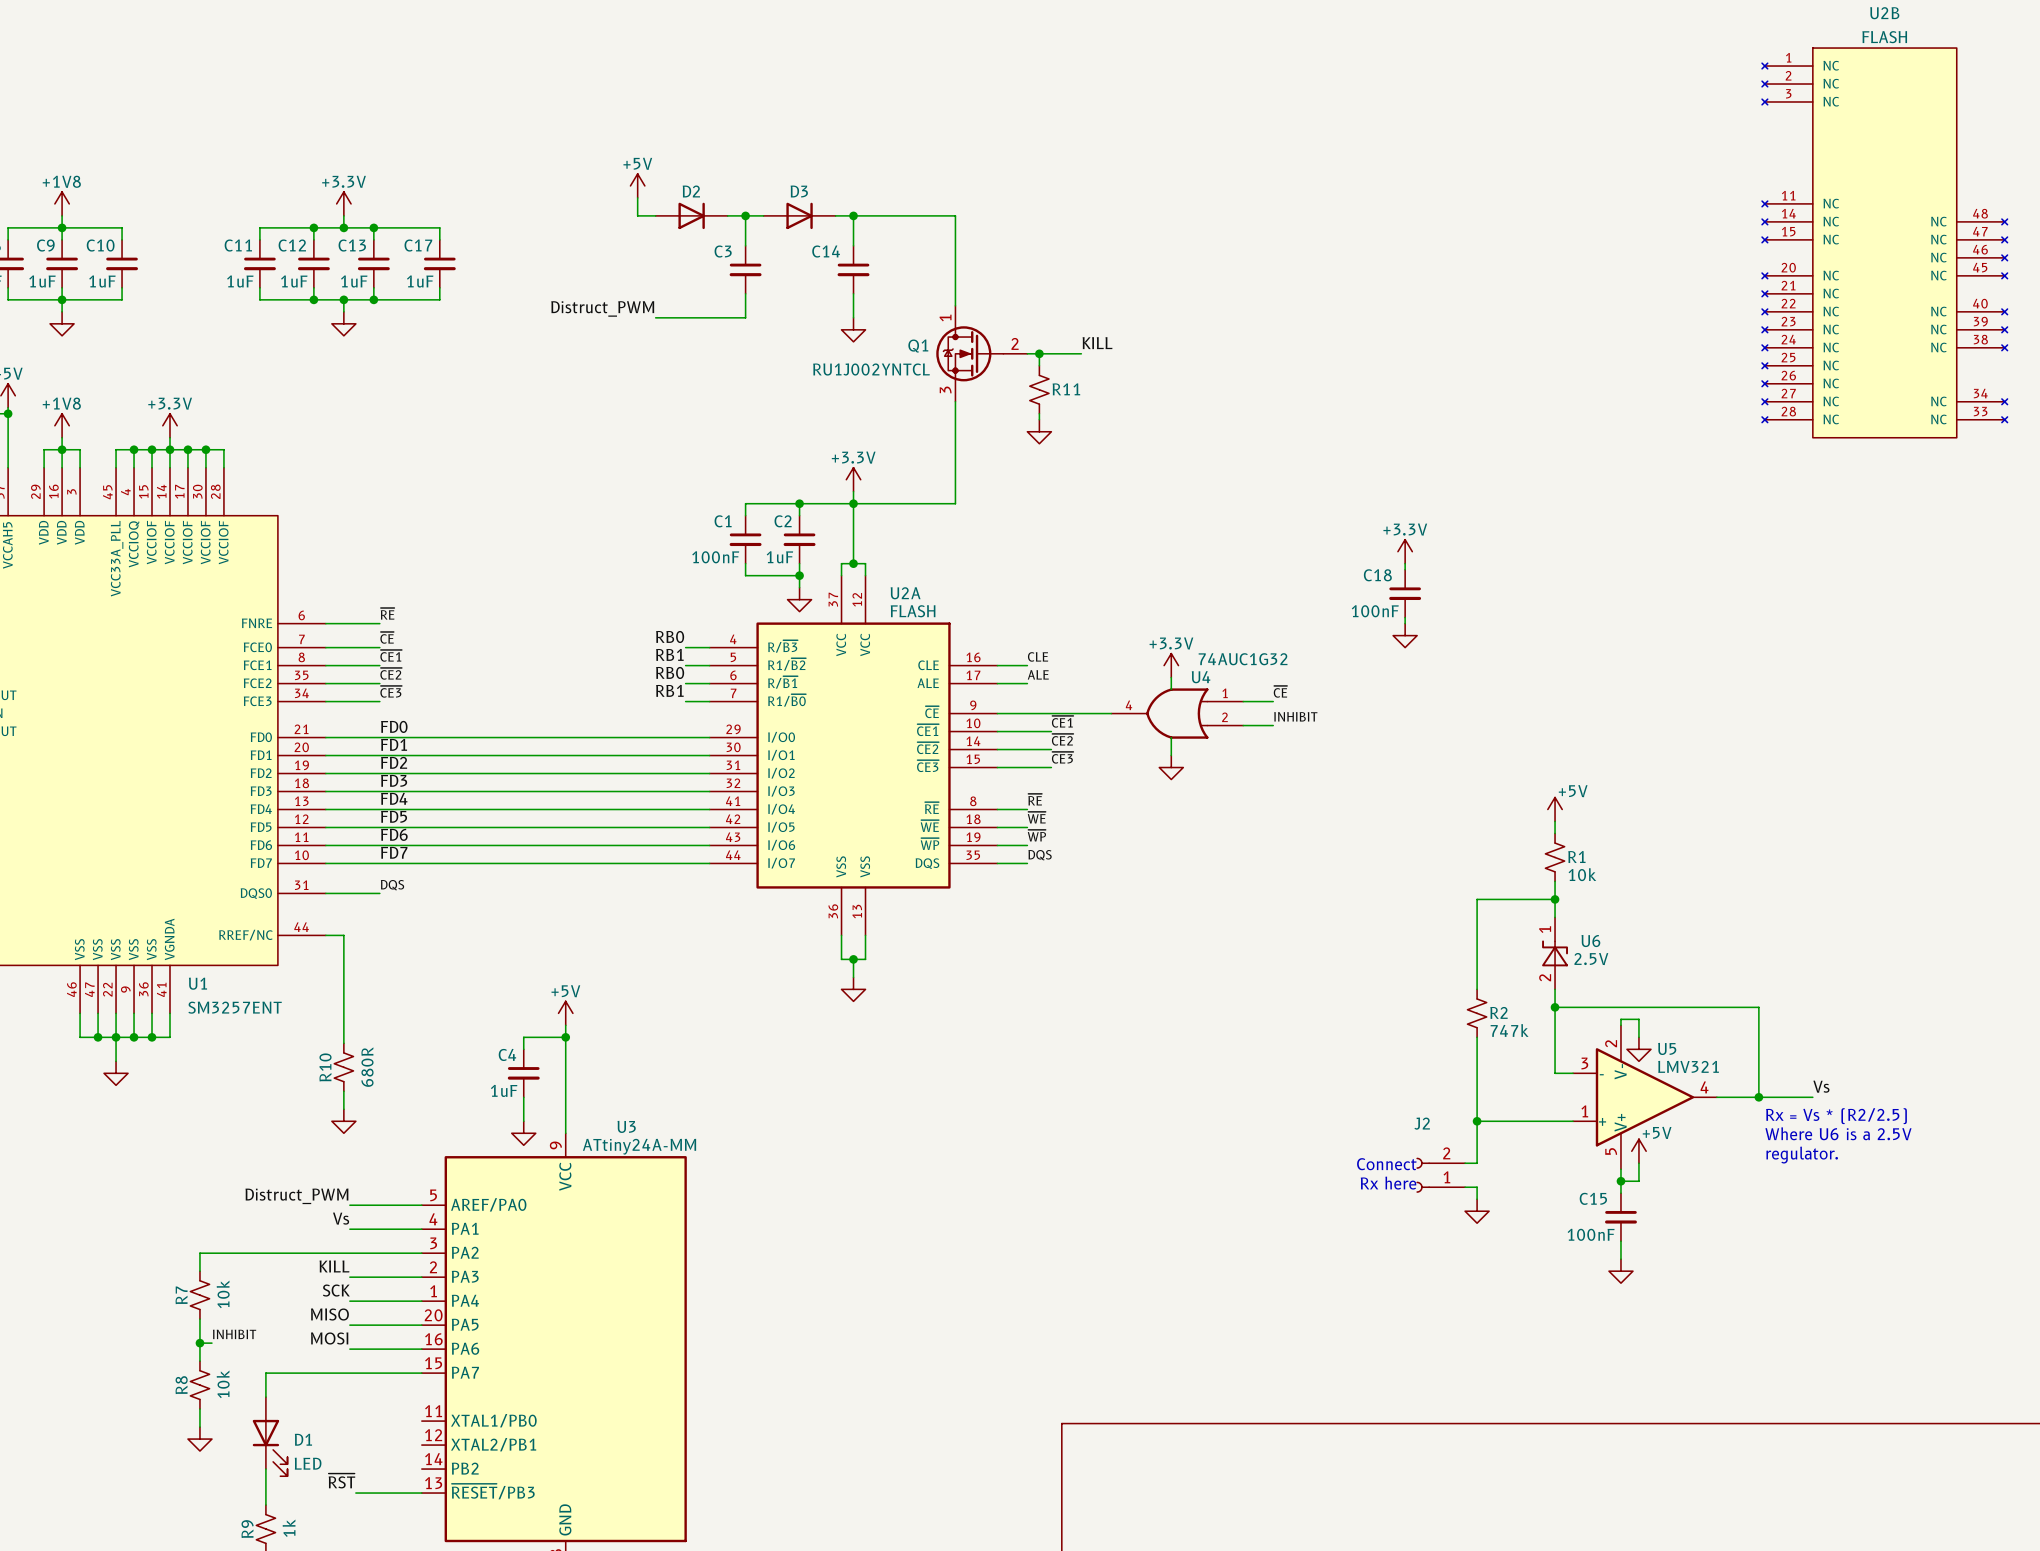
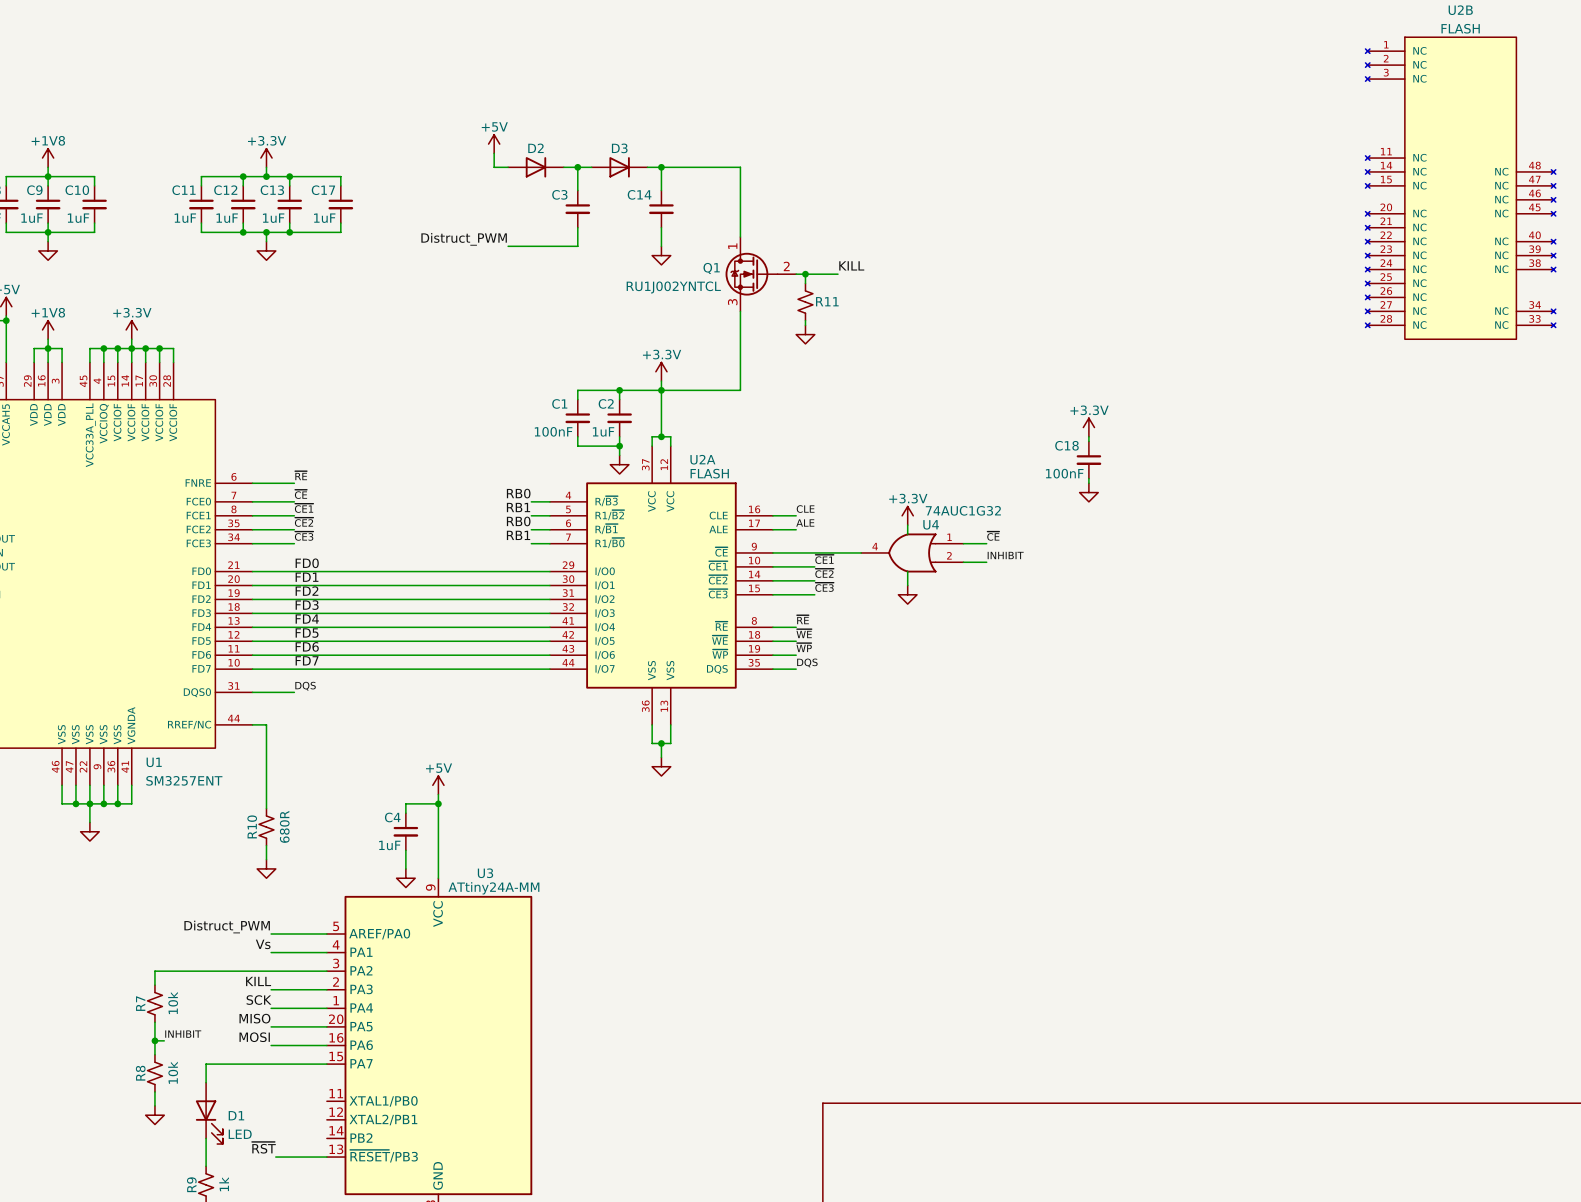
power symbol: +5V (1555, 809) -> none
wire: (1555, 821) (1555, 833) -> none
R1: 10k (1555, 857) -> none
wire: (1555, 881) (1555, 917) -> none
wire: (1555, 899) (1477, 899) (1477, 989) -> none
junction: (1555, 899) -> none
U6: (1555, 953) -> none
wire: (1555, 989) (1555, 1073) (1573, 1073) -> none
wire: (1555, 1007) (1758, 1007) (1758, 1097) -> none
junction: (1555, 1007) -> none
R2: 747k (1477, 1013) -> none
wire: (1620, 1025) (1620, 1019) (1638, 1019) (1638, 1037) -> none
wire: (1477, 1037) (1477, 1163) (1465, 1163) -> none
power symbol: (1638, 1049) -> none
label: Vs (1821, 1086) -> none
U5: LMV321 (1644, 1097) -> none
wire: (1716, 1097) (1812, 1097) -> none
junction: (1758, 1097) -> none
text: Rx = Vs * (R2/2.5) (1836, 1116) -> none
wire: (1477, 1121) (1573, 1121) -> none
junction: (1477, 1121) -> none
text: Where U6 is a 2.5V (1838, 1133) -> none
power symbol: +5V (1638, 1151) -> none
text: regulator. (1802, 1155) -> none
wire: (1638, 1163) (1638, 1181) (1620, 1181) -> none
text: Connect (1386, 1164) -> none
wire: (1620, 1169) (1620, 1193) -> none
J2: (1440, 1175) -> none
junction: (1620, 1181) -> none
text: Rx here (1388, 1183) -> none
wire: (1465, 1187) (1477, 1187) (1477, 1199) -> none
power symbol: (1477, 1211) -> none
C15: 100nF (1620, 1217) -> none
wire: (1620, 1241) (1620, 1259) -> none
power symbol: (1620, 1271) -> none

